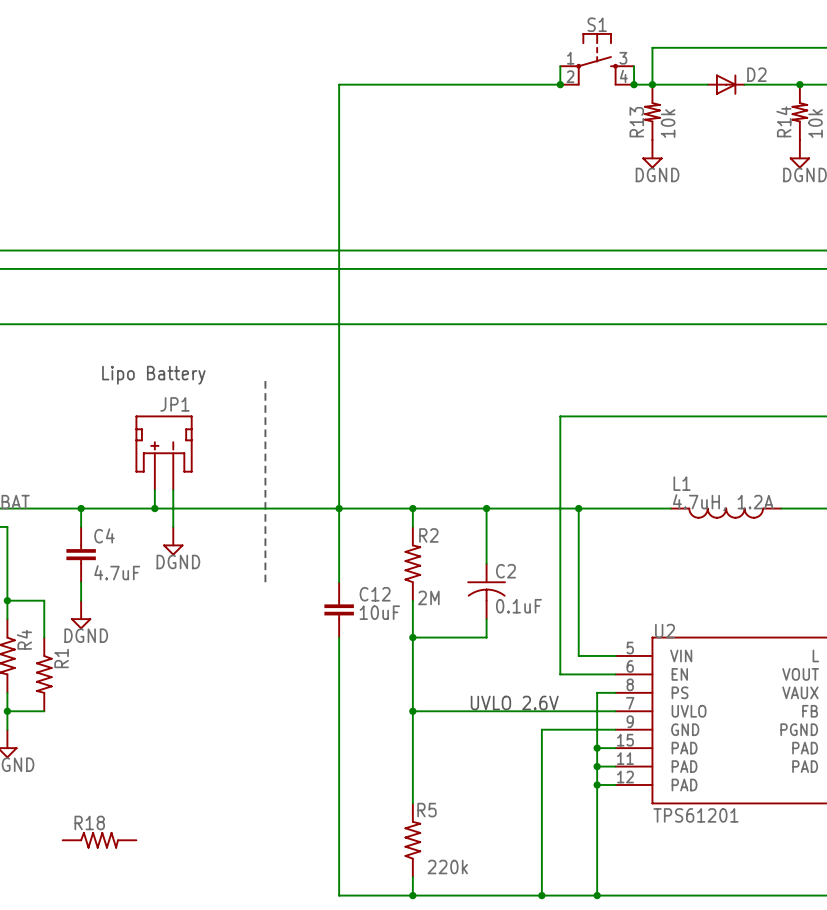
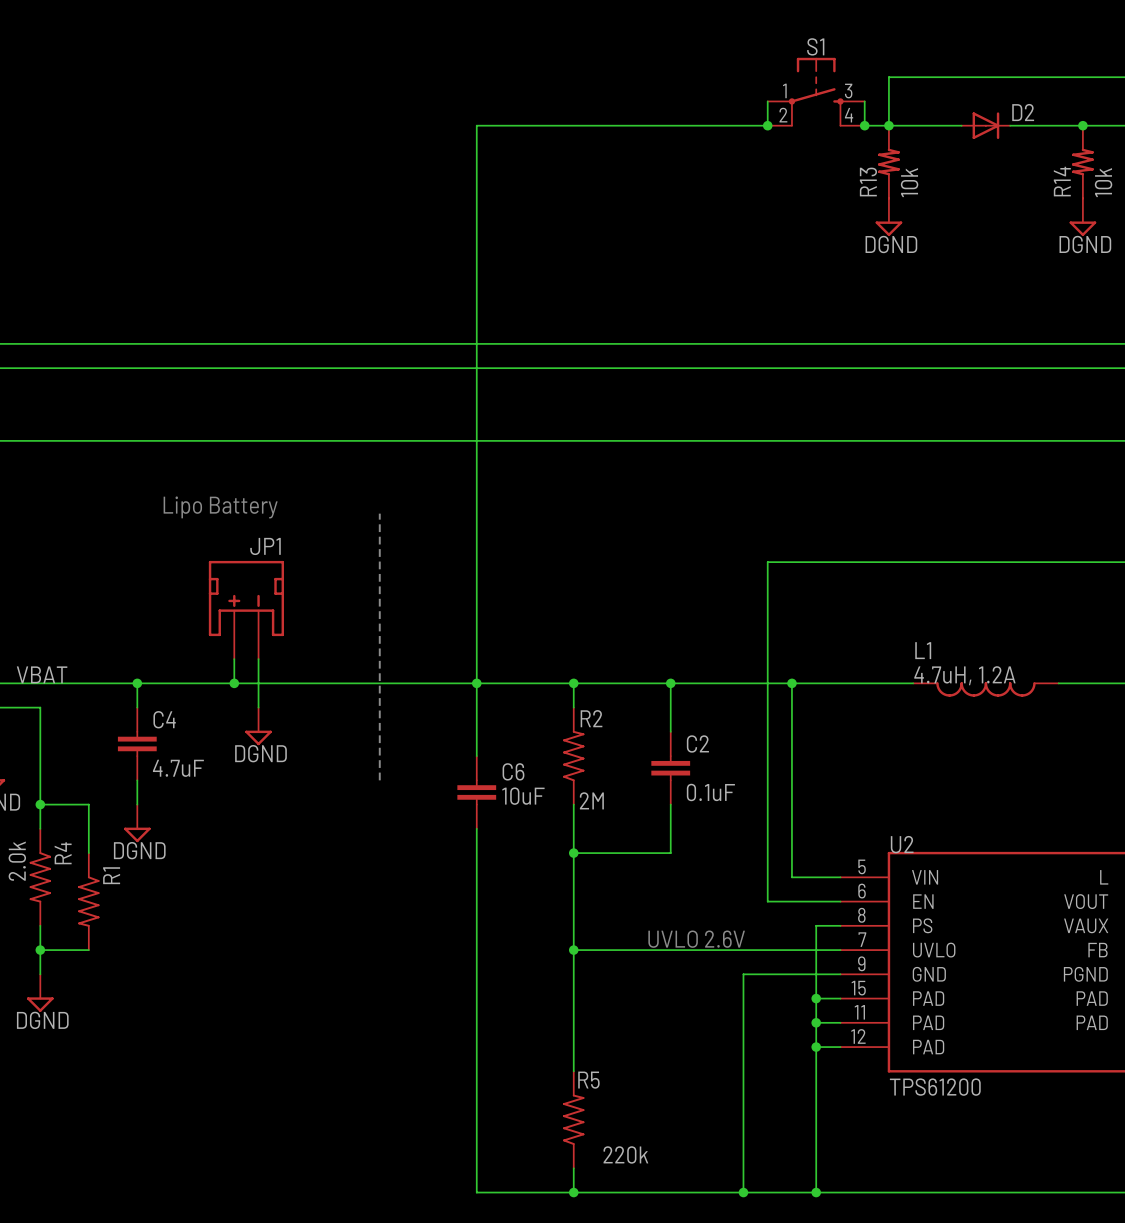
C2 symbol: [467, 563, 506, 620] -> [651, 731, 691, 805]
C6: none -> 10uF (476, 792)
C12: 10uF (339, 609) -> none
U2 value: TPS61201 (695, 815) -> TPS61200 (935, 1087)
R18: (99, 840) -> none

